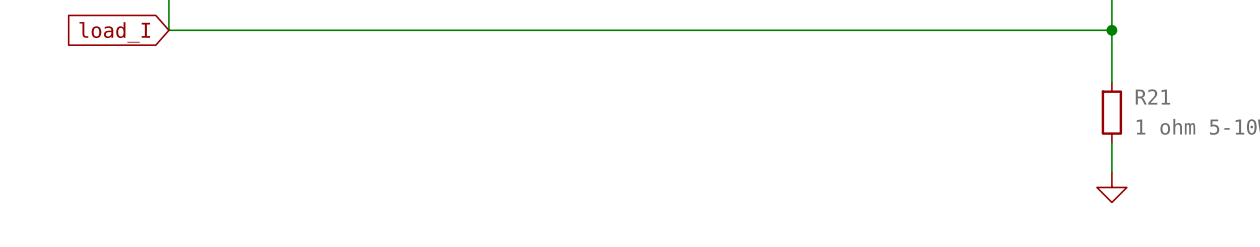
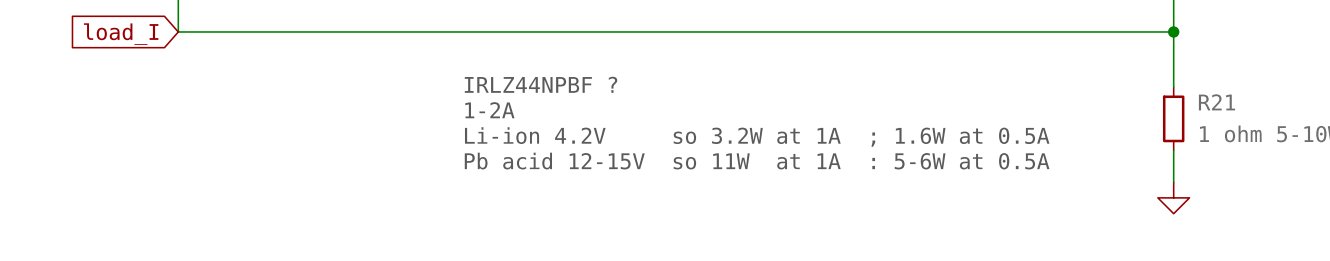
text: none -> IRLZ44NPBF ? (541, 84)
text: none -> 1-2A (489, 110)
text: none -> Li-ion 4.2V so 3.2W at 1A ; 1.6W at 0.5A (757, 136)
text: none -> Pb acid 12-15V so 11W at 1A : 5-6W at 0.5A (757, 161)

